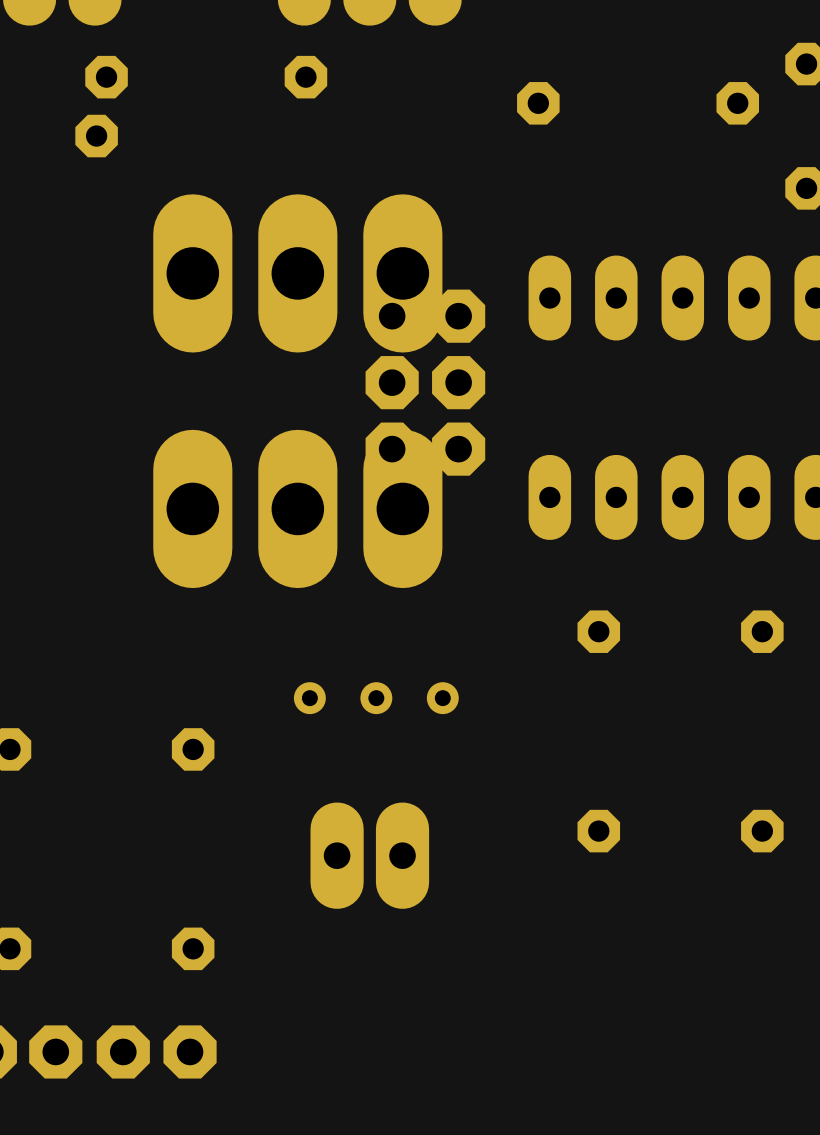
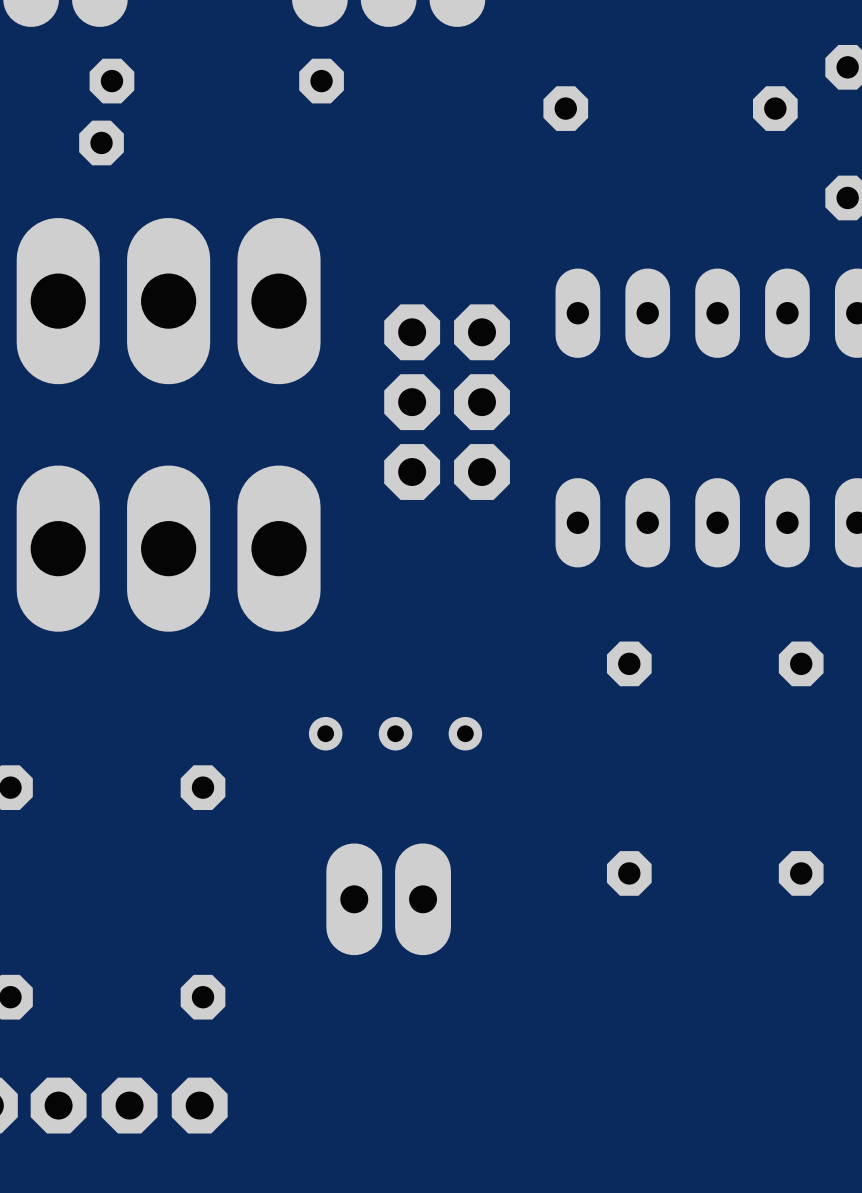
part: (297, 273) -> none
part: none -> (168, 301)
part: (297, 508) -> none
part: none -> (168, 548)

